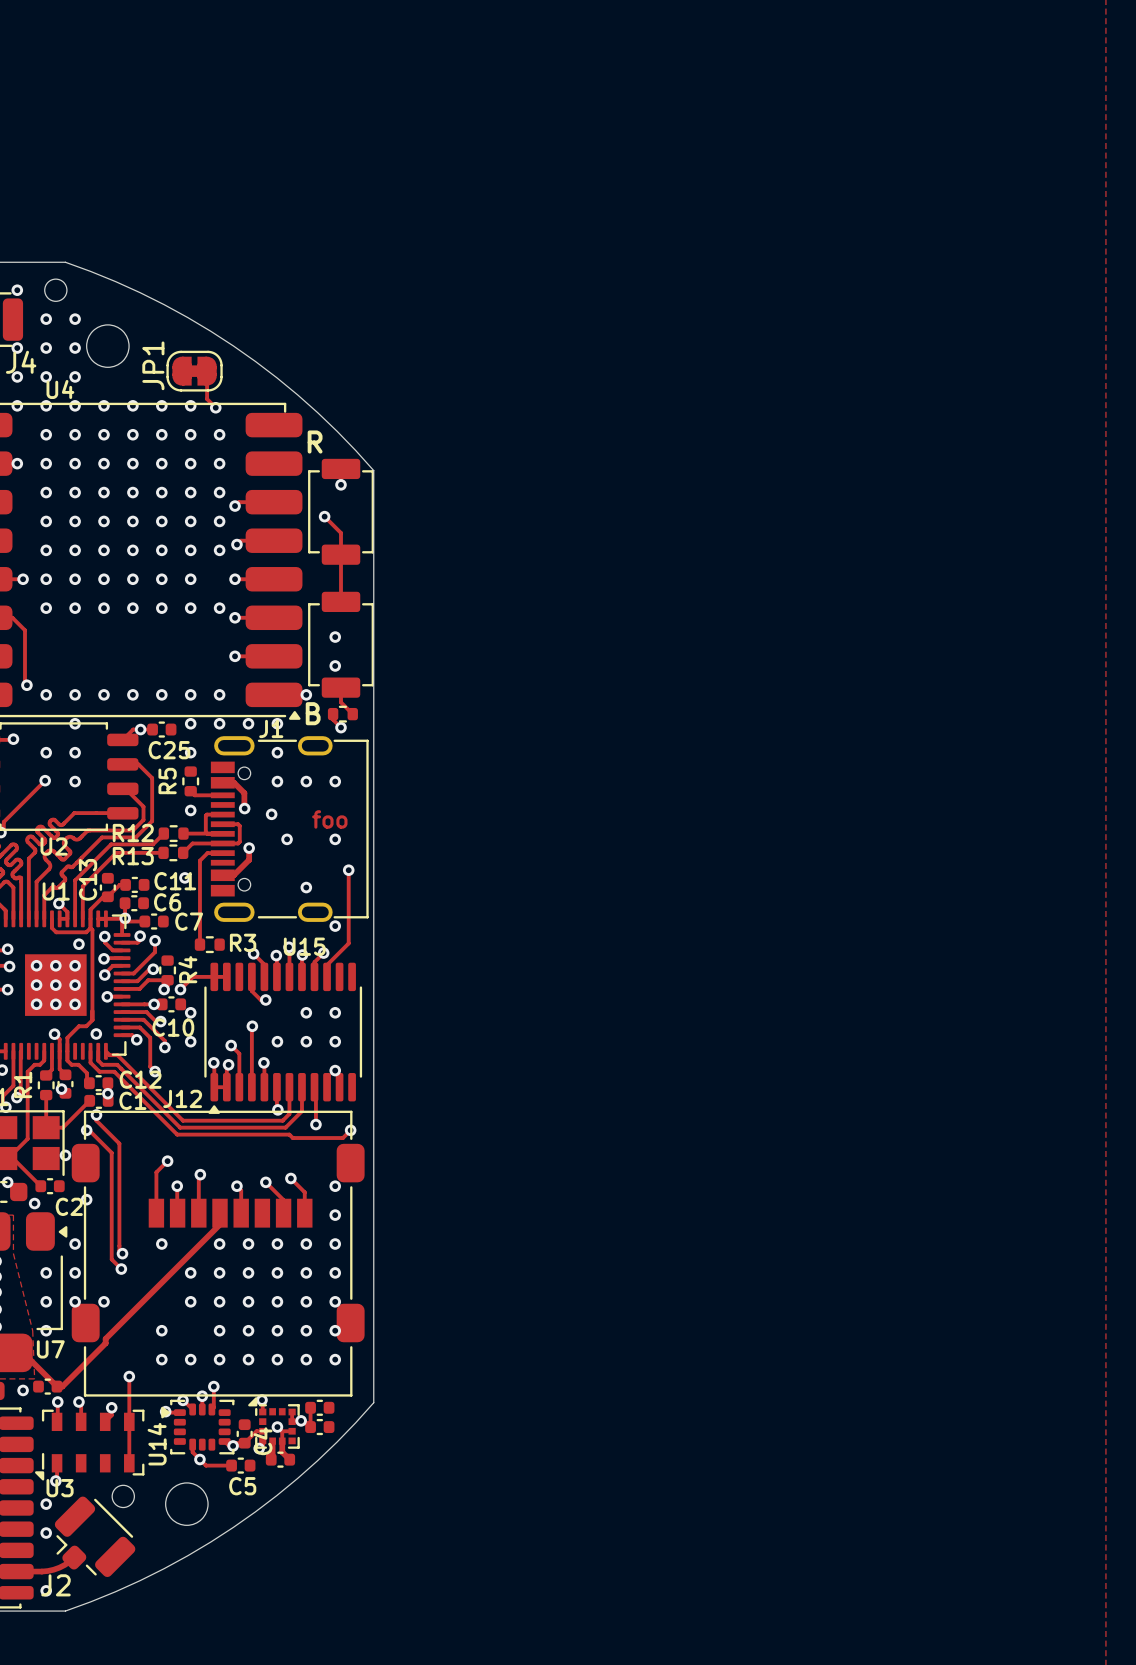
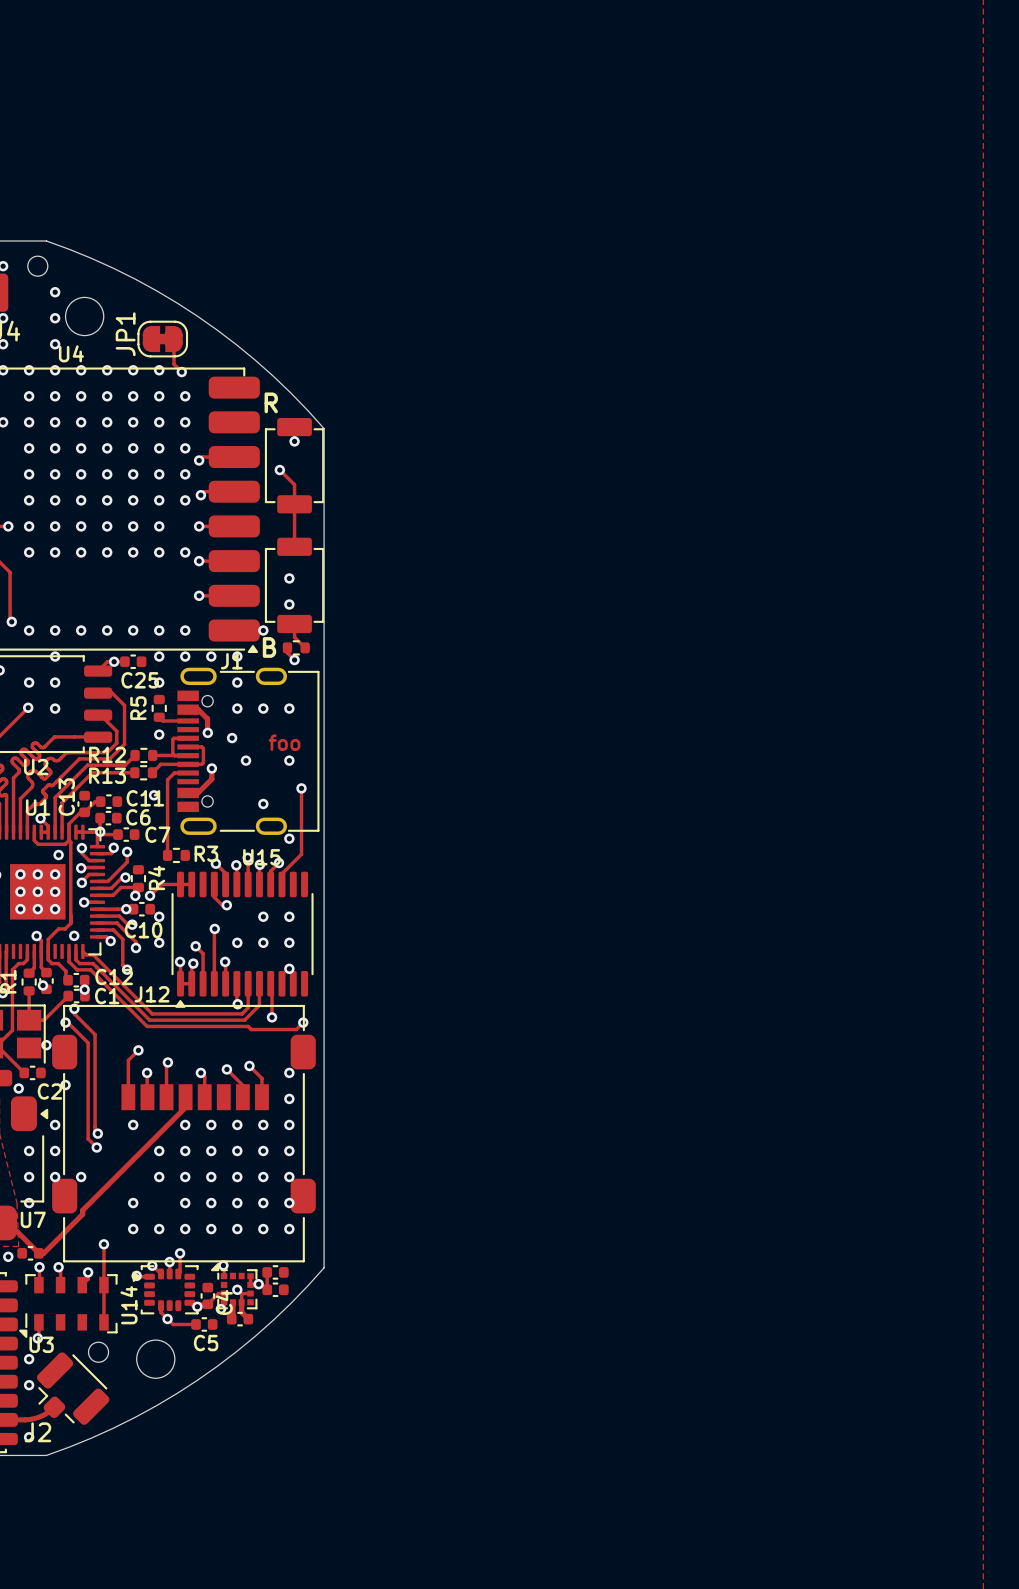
via: (46, 319) -> none
via: (46, 348) -> none
via: (46, 376) -> none
U4 name position: U4 (60, 389) -> U4 (71, 353)

